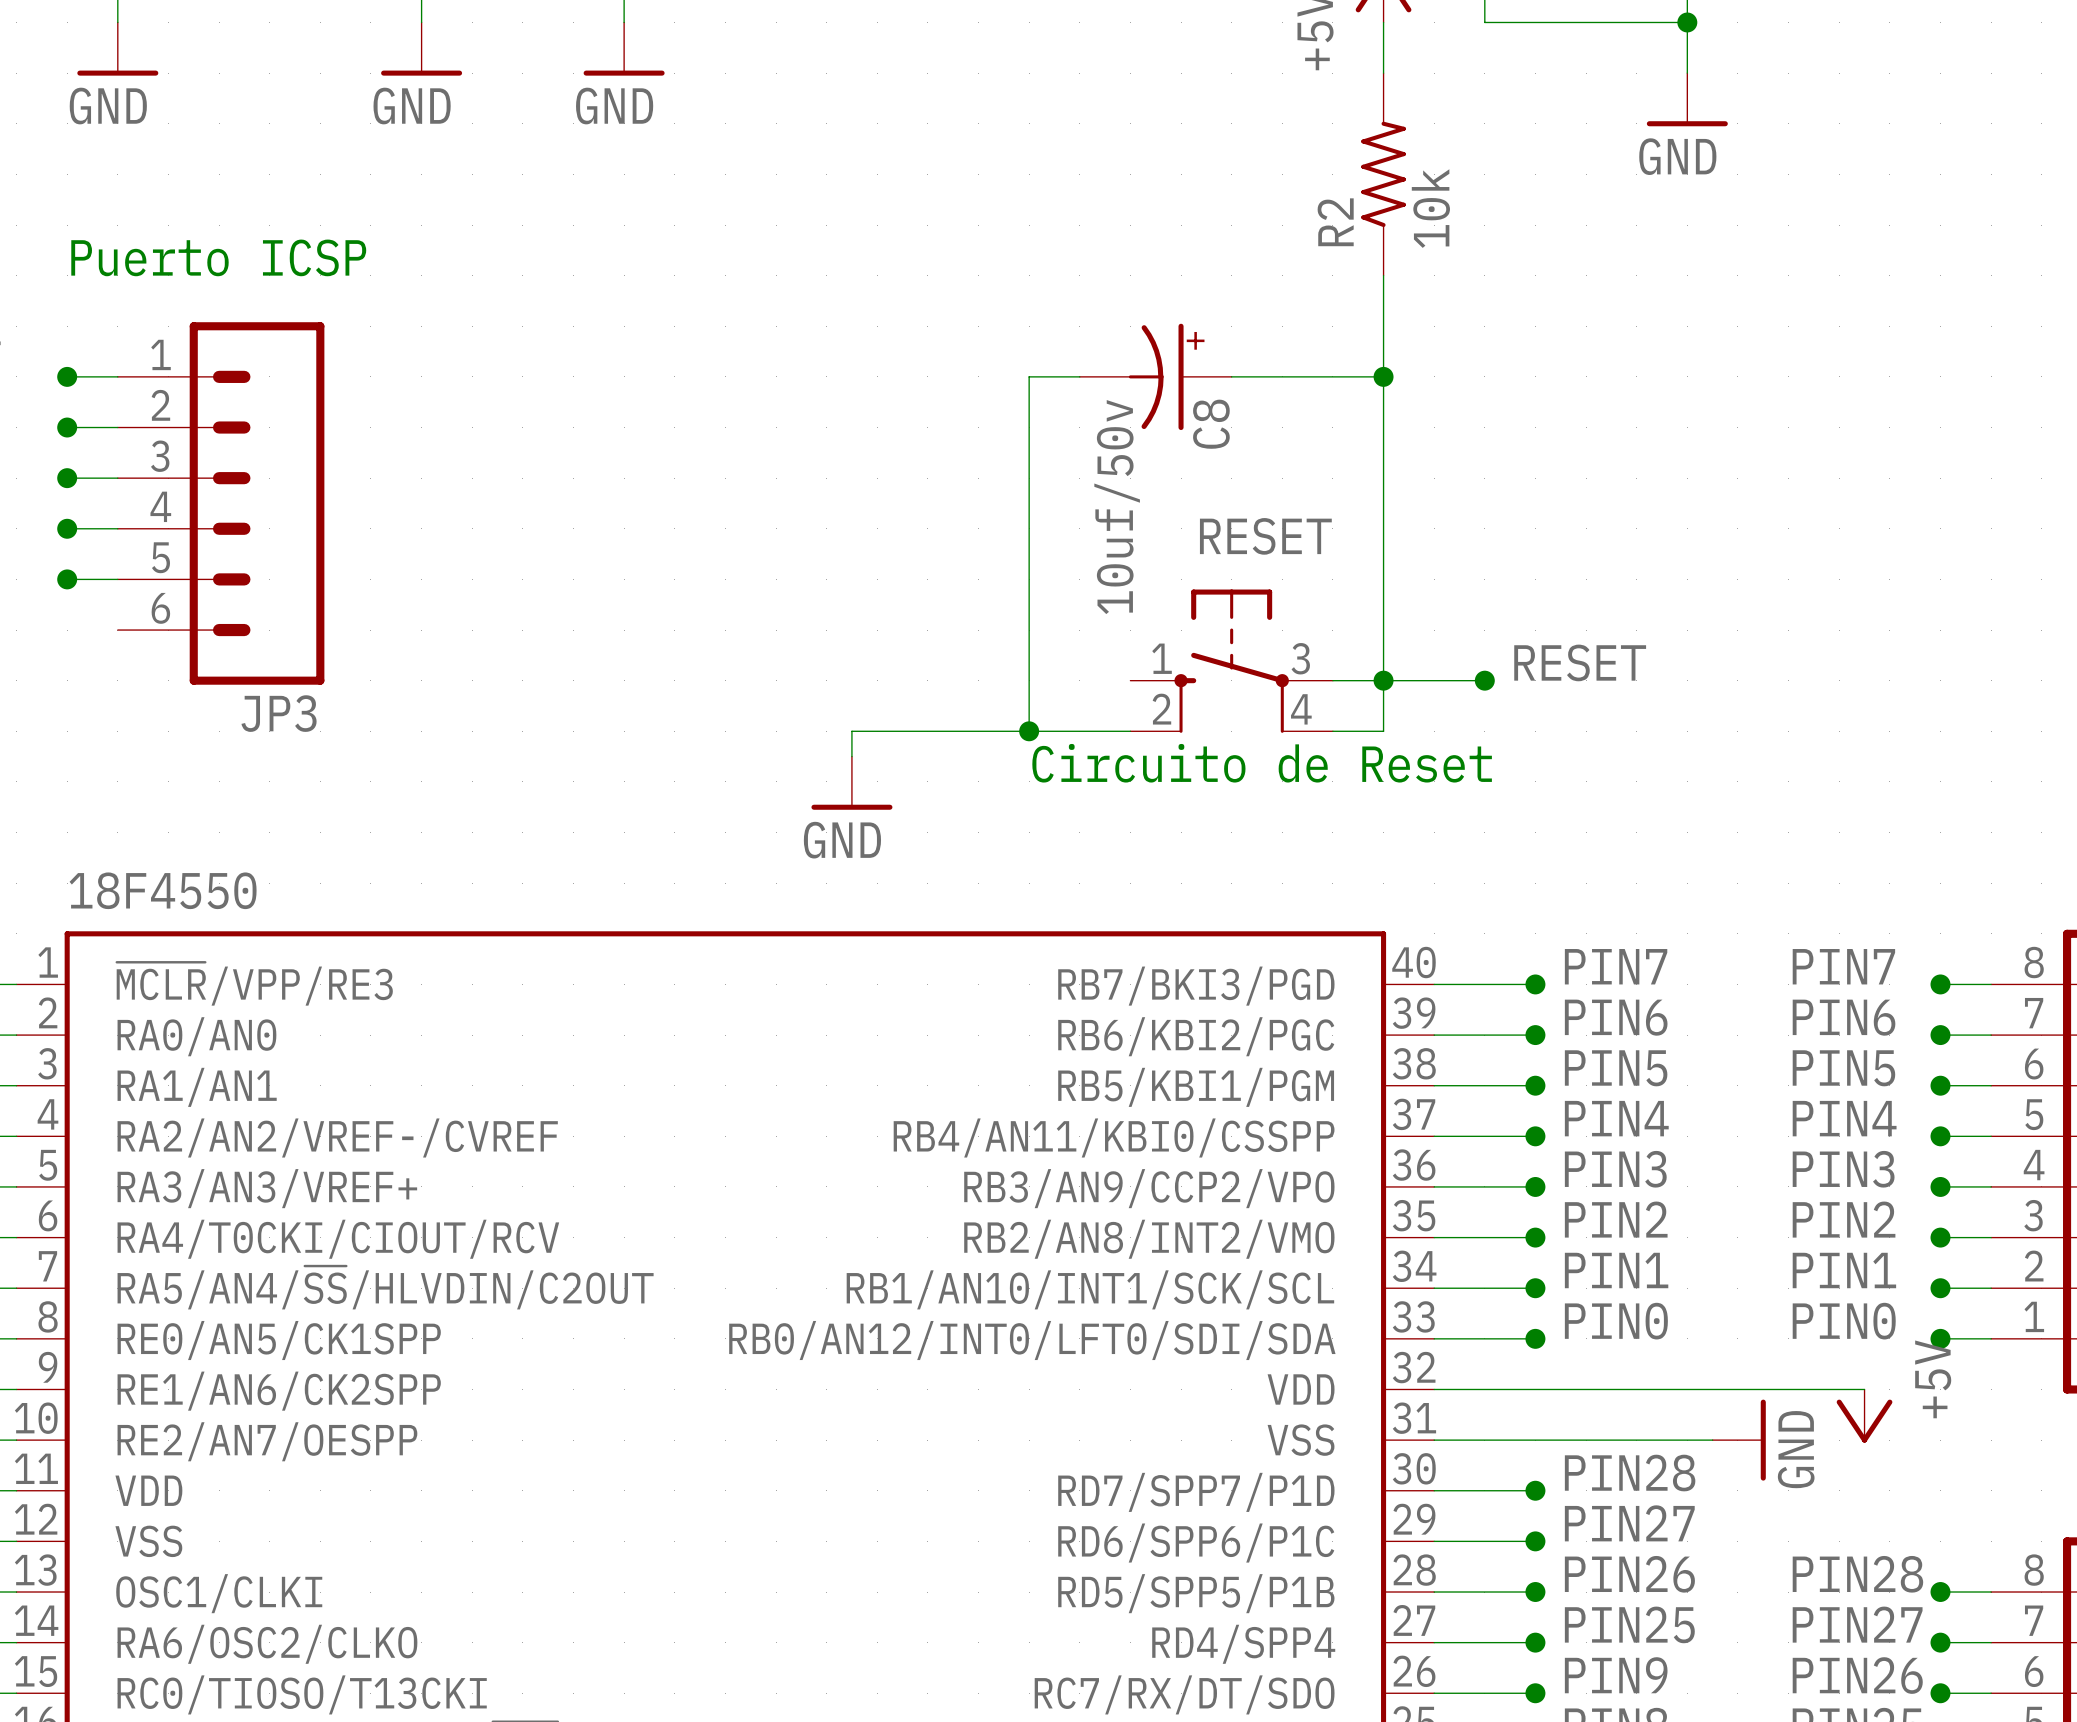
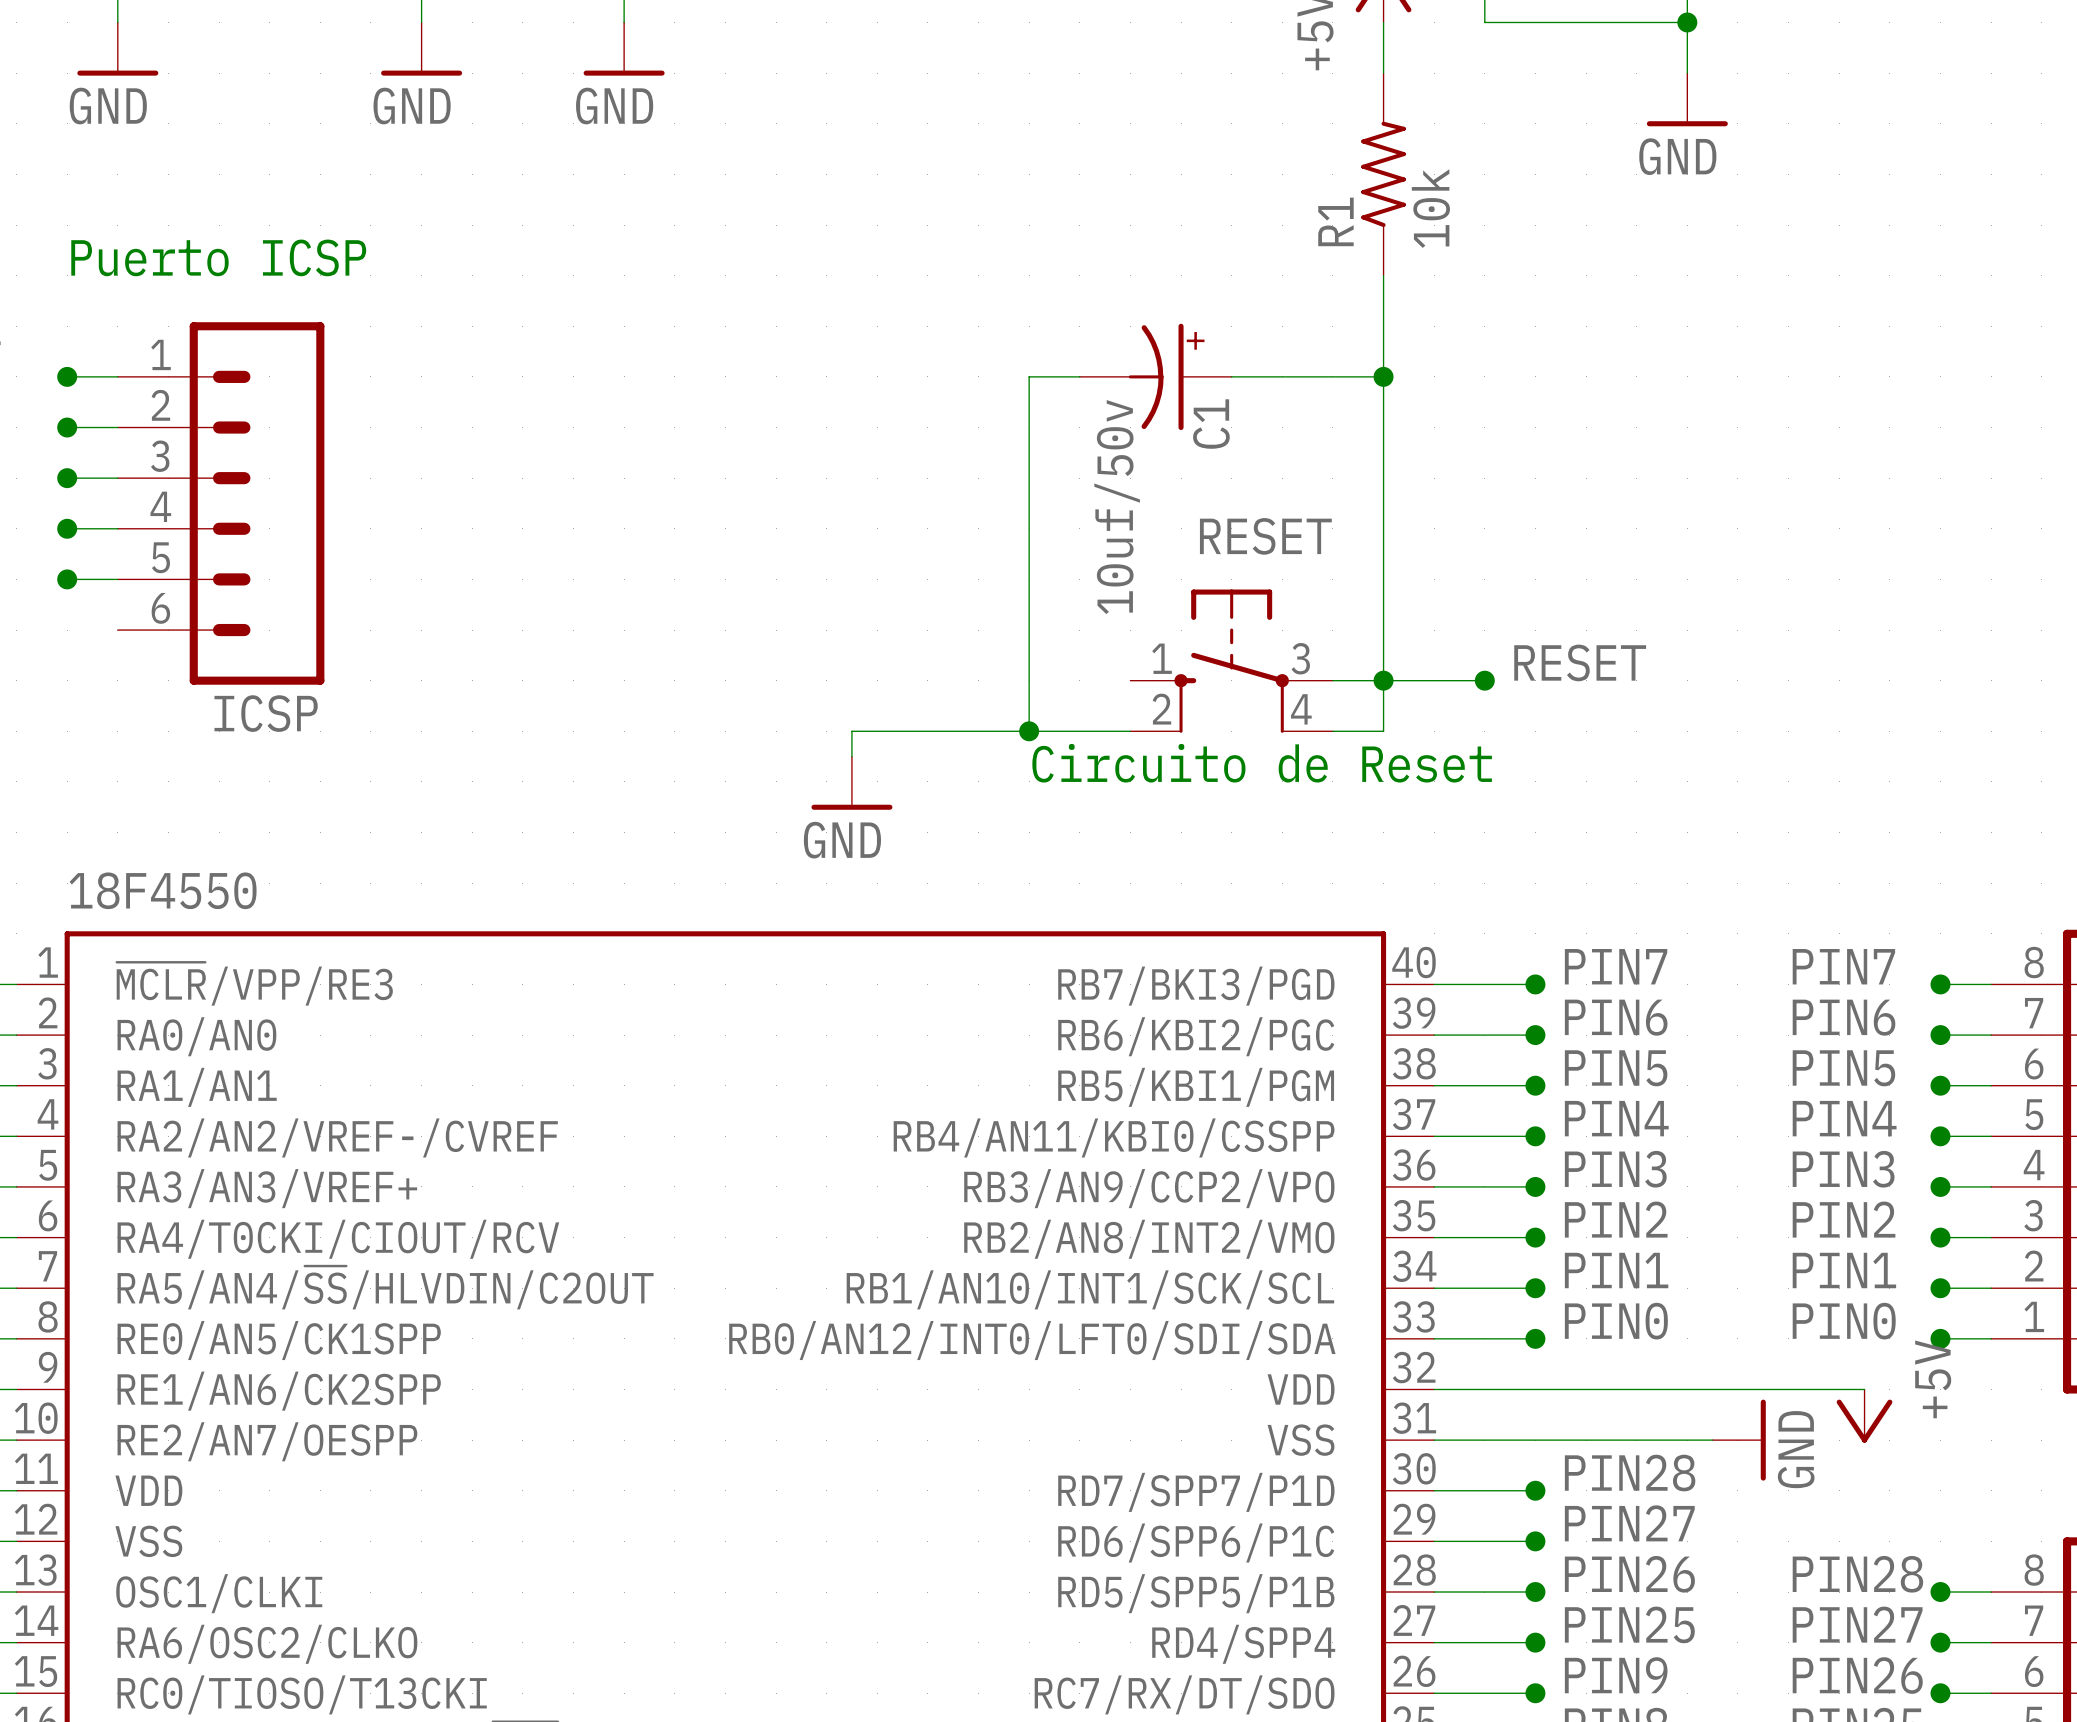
R2 name: R2 (1335, 222) -> R1 (1335, 221)
C8 name: C8 (1211, 424) -> C1 (1211, 424)
JP3 name: JP3 (279, 713) -> ICSP (266, 713)

